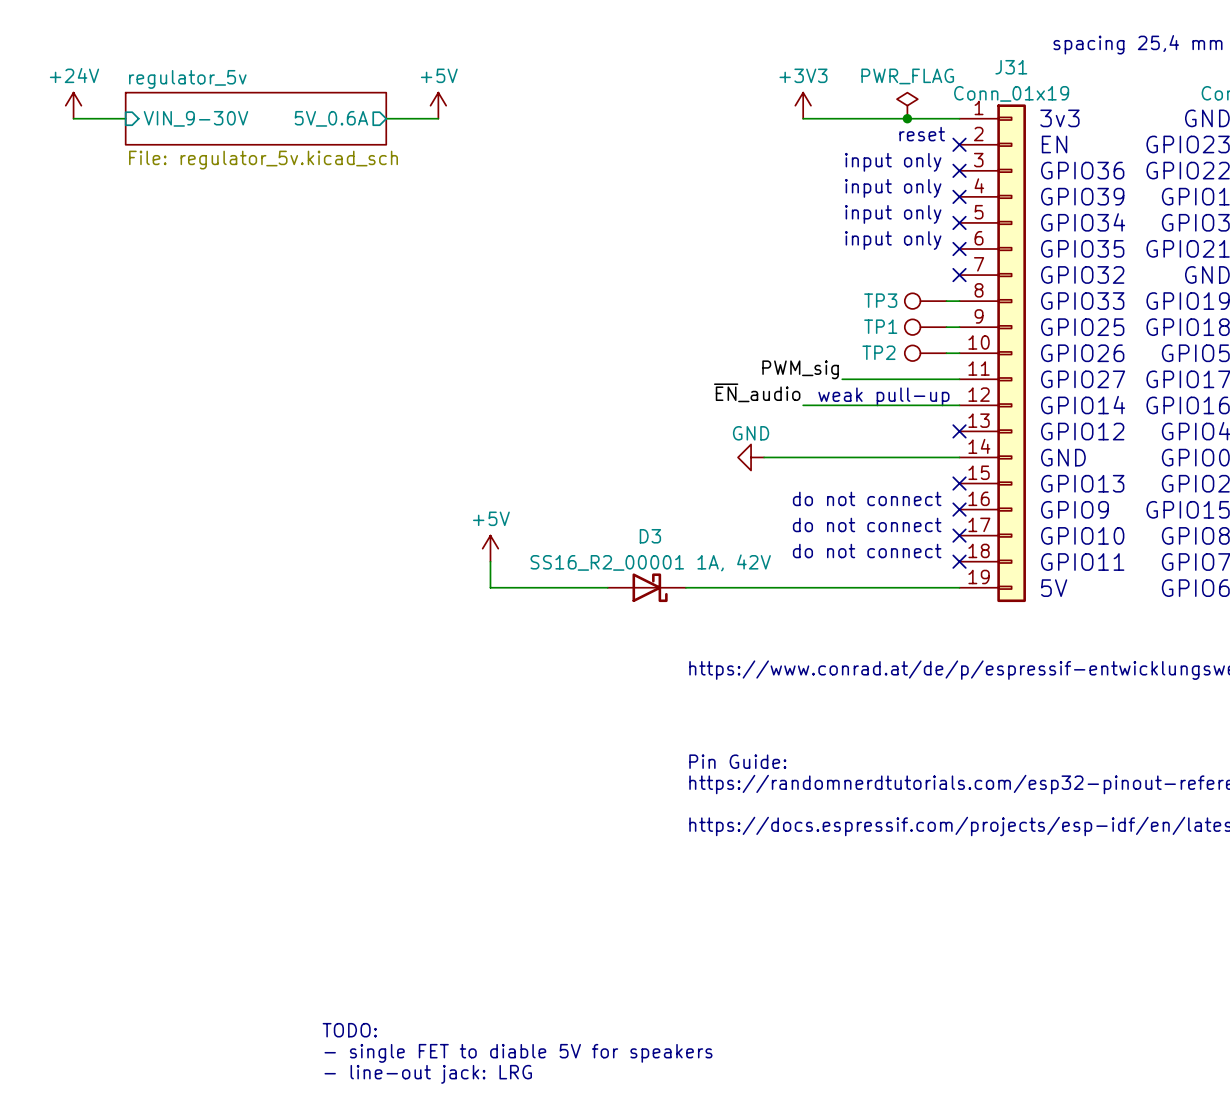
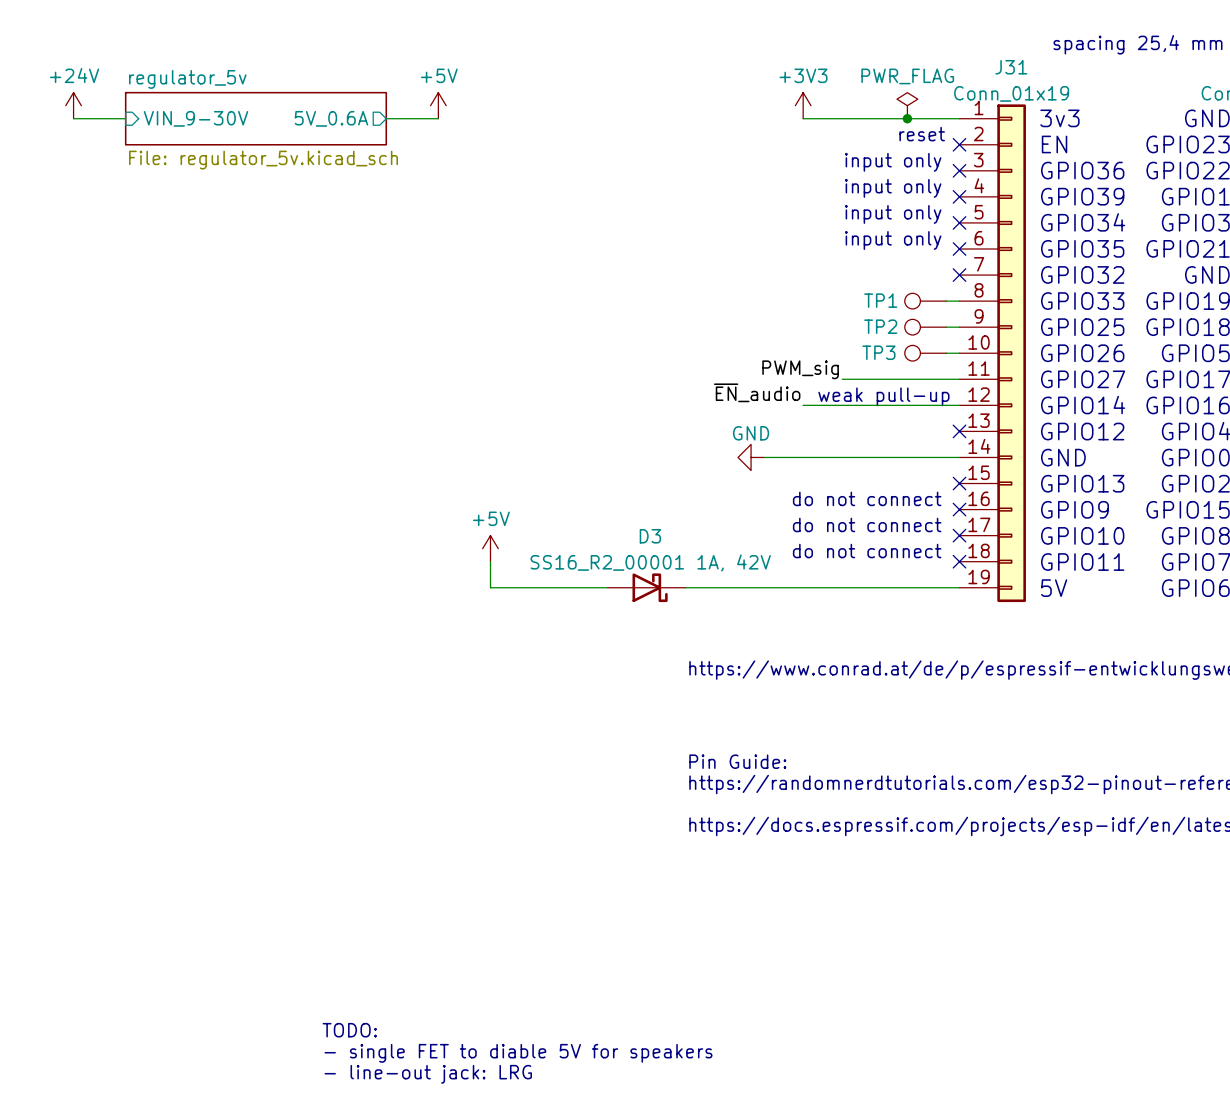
TP3 name: TP3 (880, 300) -> TP1 (880, 300)
TP1 name: TP1 (880, 326) -> TP2 (880, 326)
TP2 name: TP2 (878, 352) -> TP3 (878, 352)

